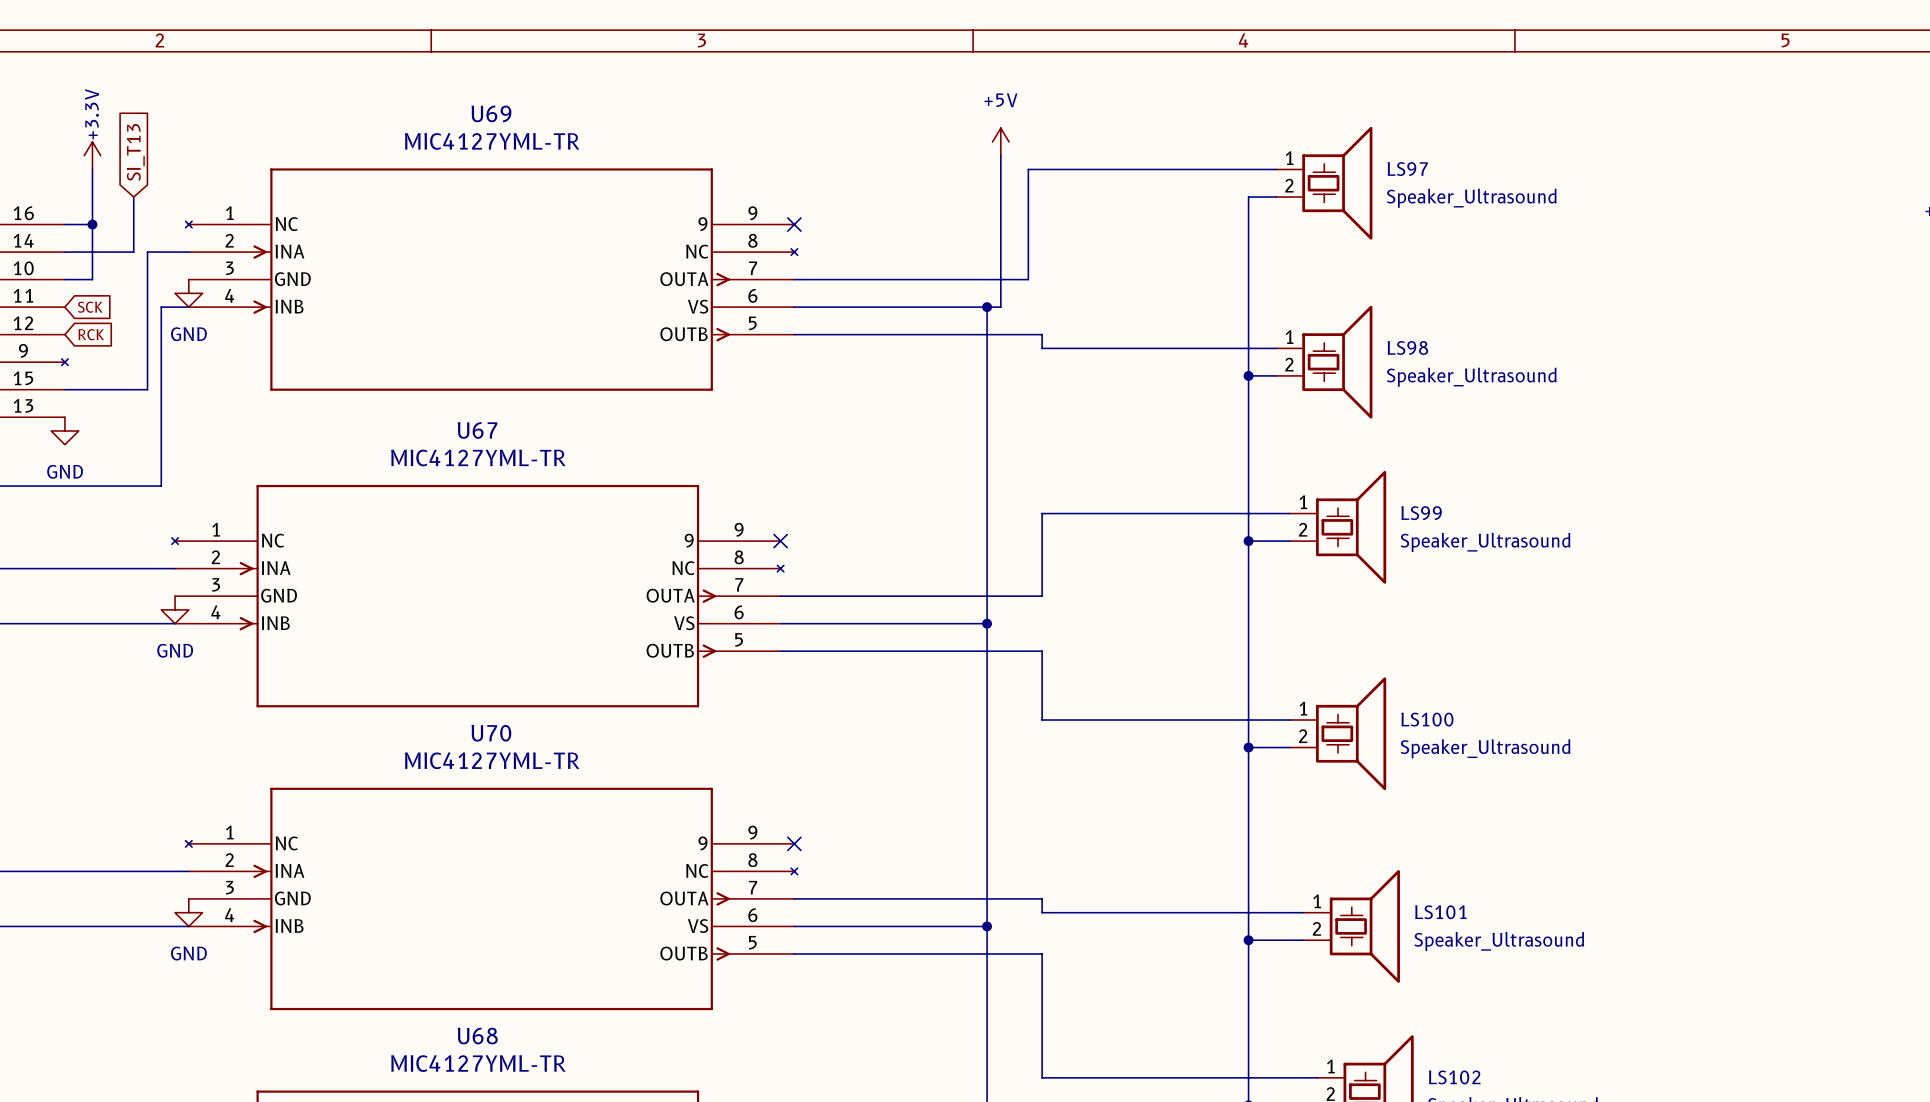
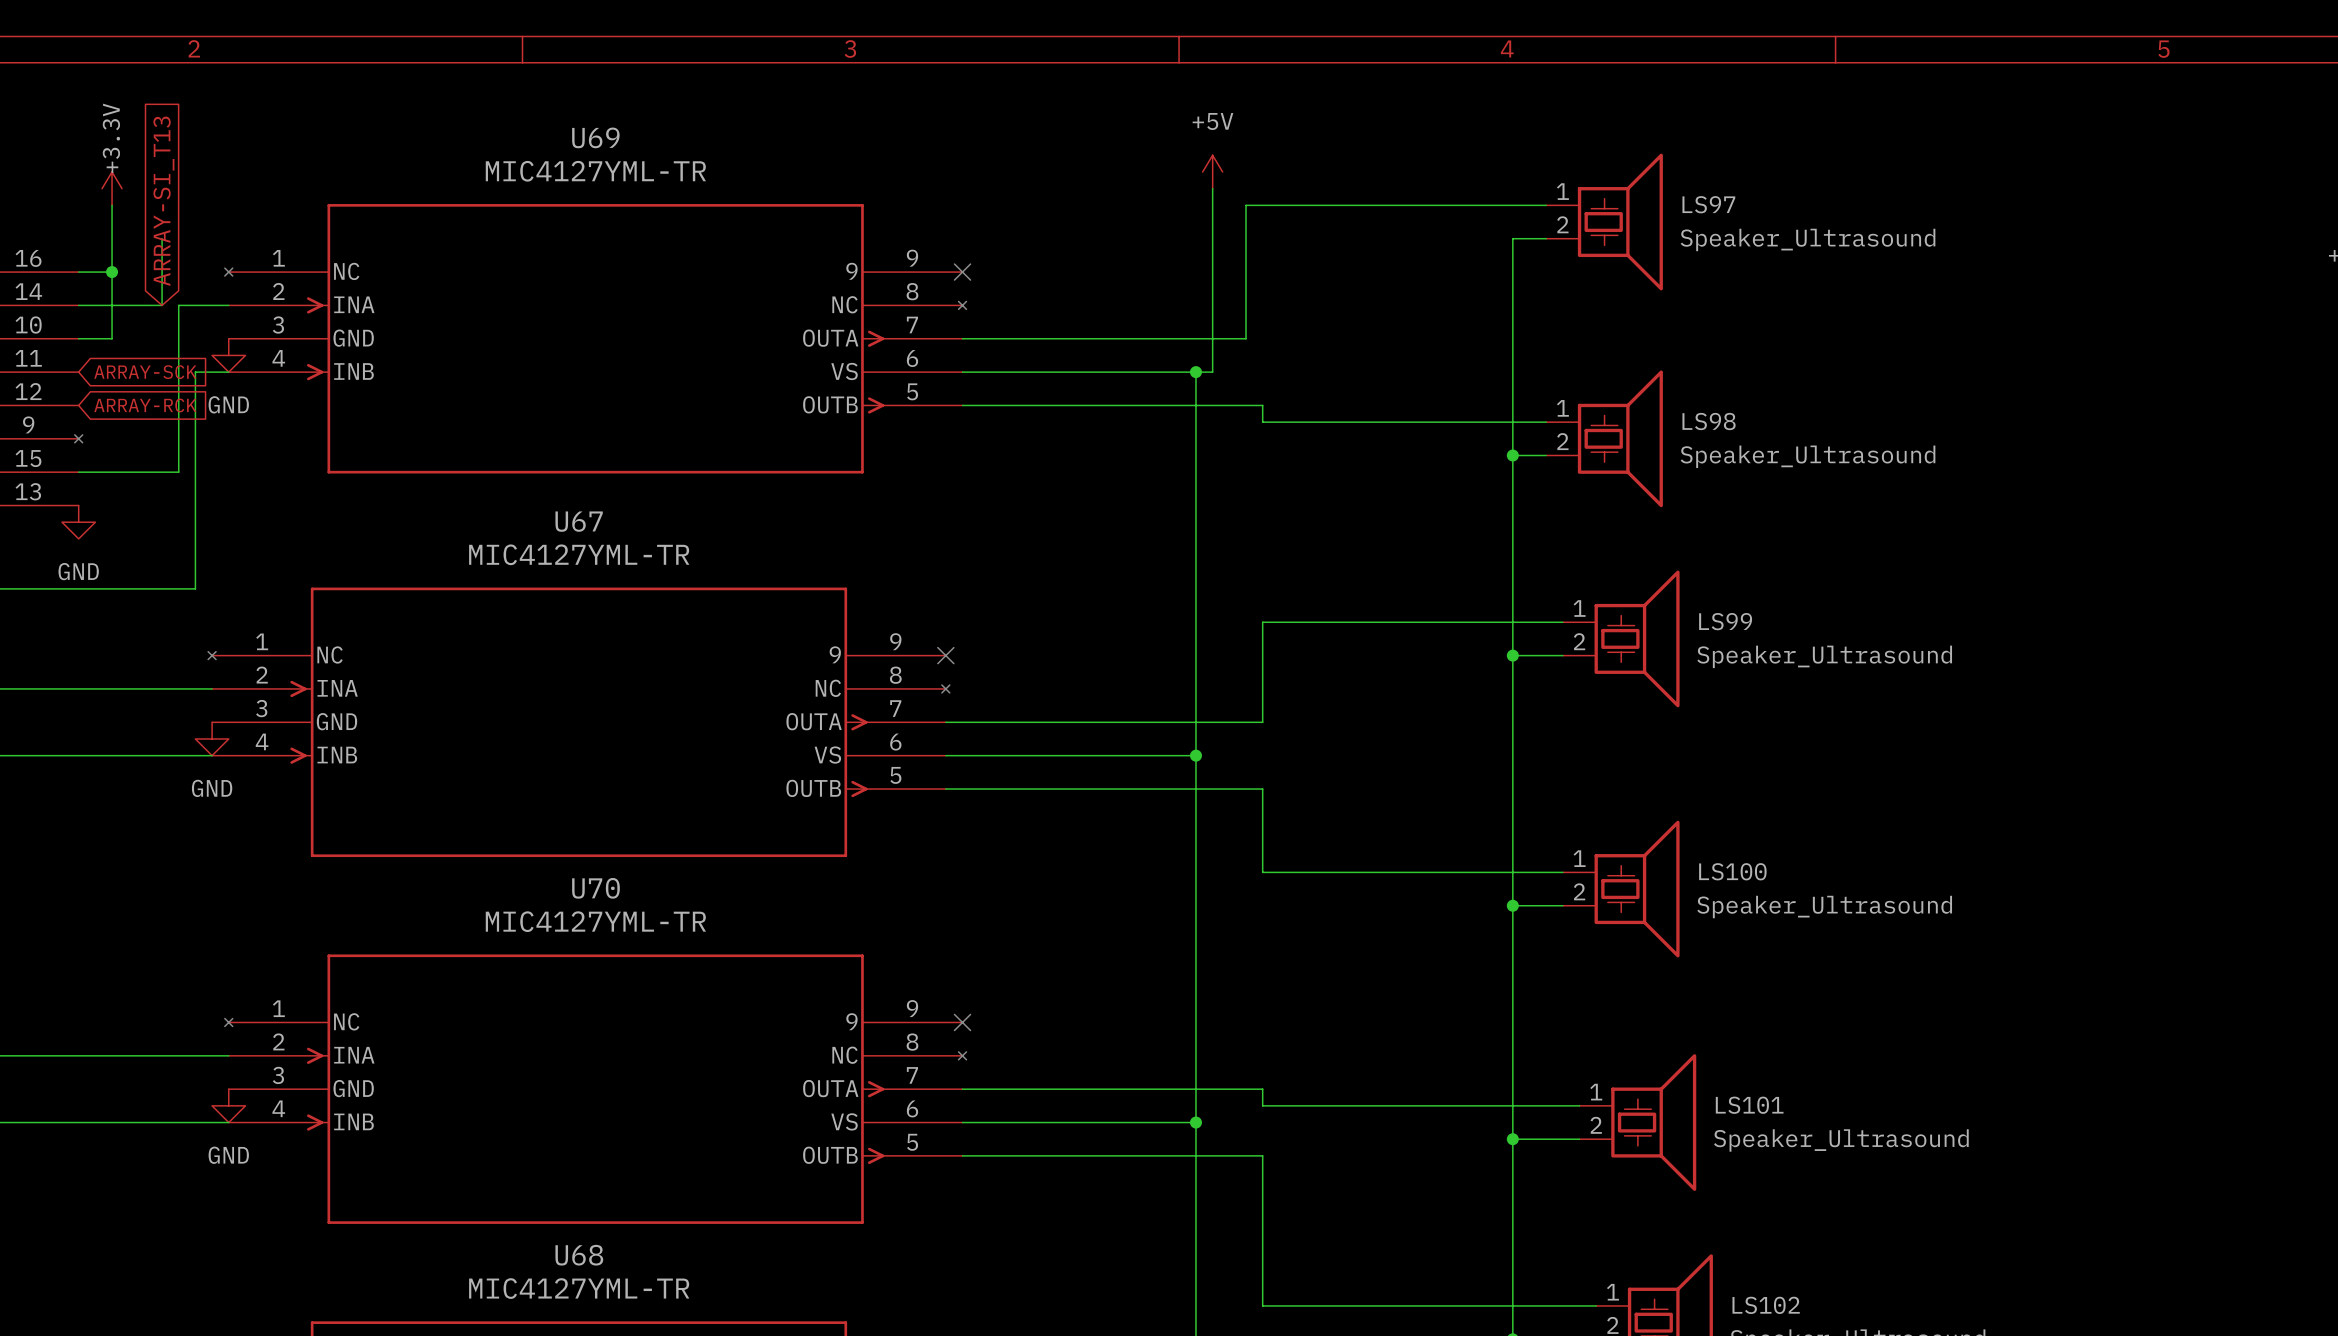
global label: SI_T13 (135, 152) -> ARRAY-SI_T13 (163, 201)
global label: SCK (90, 307) -> ARRAY-SCK (145, 372)
global label: RCK (91, 334) -> ARRAY-RCK (145, 405)

